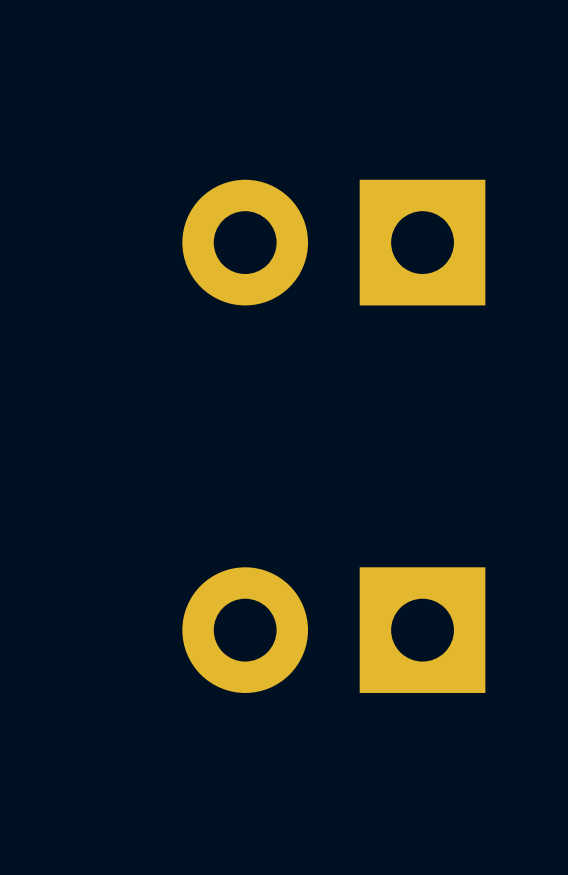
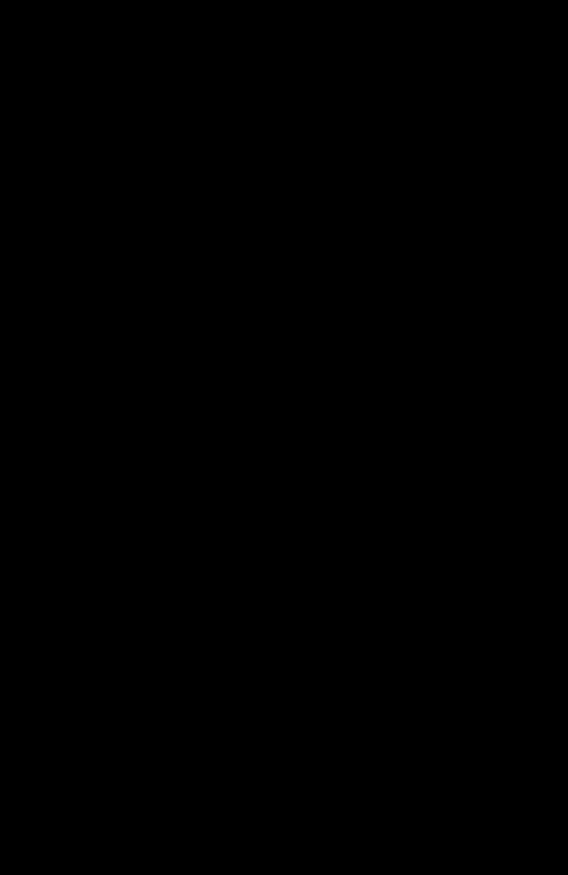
part: (333, 242) -> none
part: (333, 630) -> none

